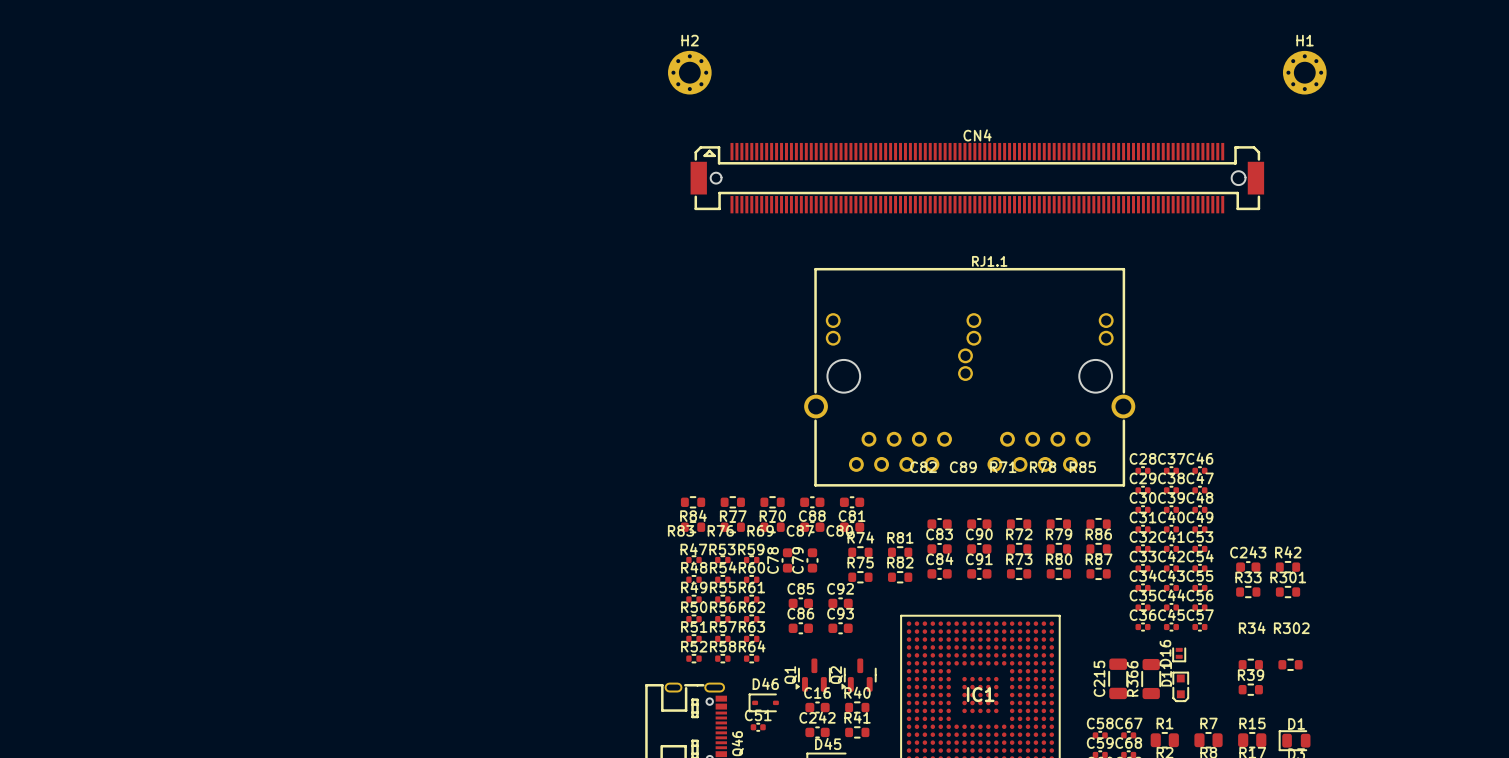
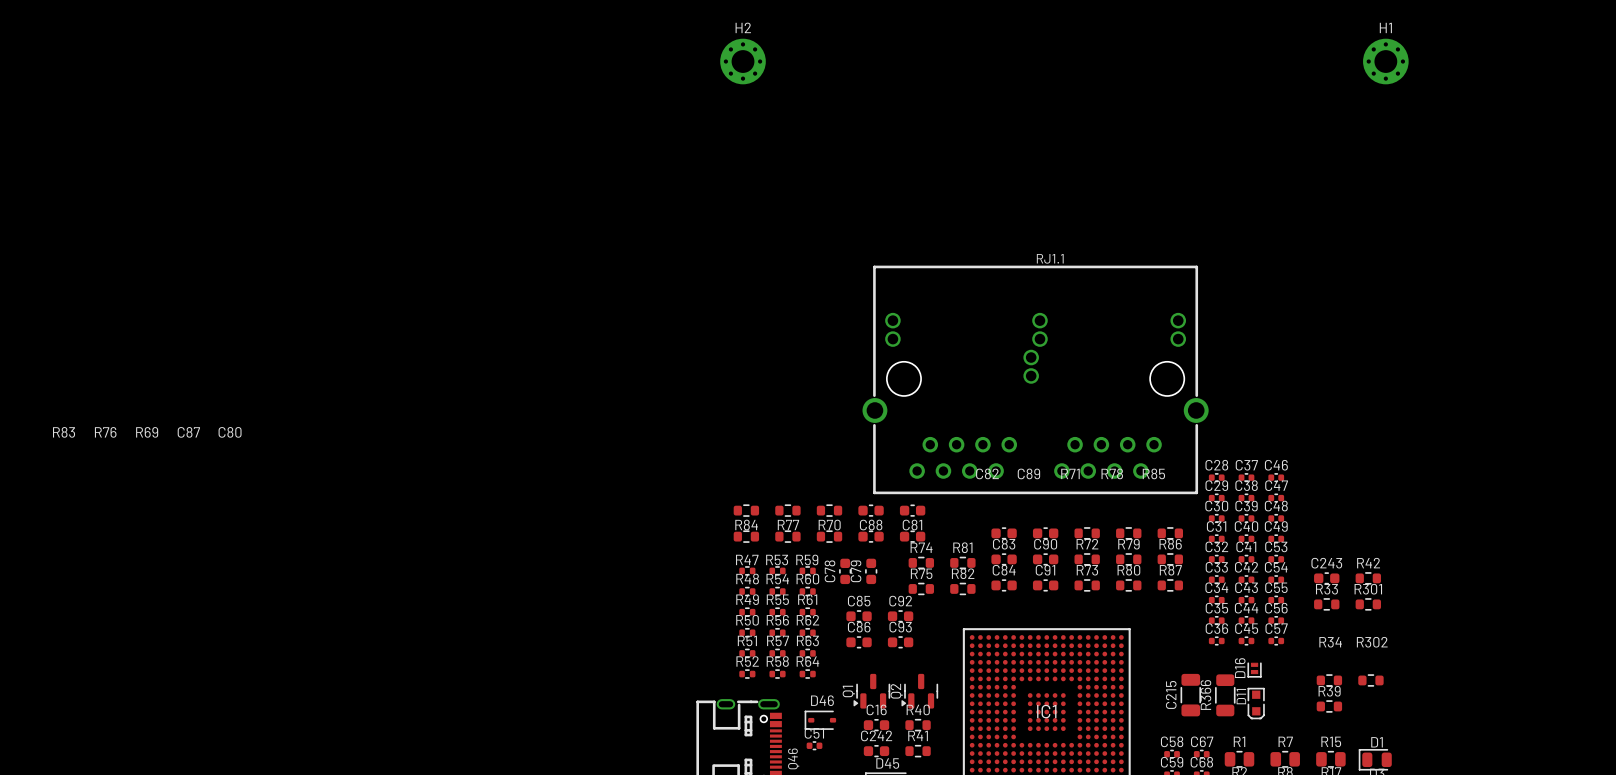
CN4: (977, 178) -> none
R83 name position: R83 (681, 530) -> R83 (64, 432)
R76 name position: R76 (720, 530) -> R76 (105, 432)
R69 name position: R69 (760, 530) -> R69 (147, 432)
C87 name position: C87 (800, 530) -> C87 (188, 432)
C80 name position: C80 (839, 530) -> C80 (230, 432)

